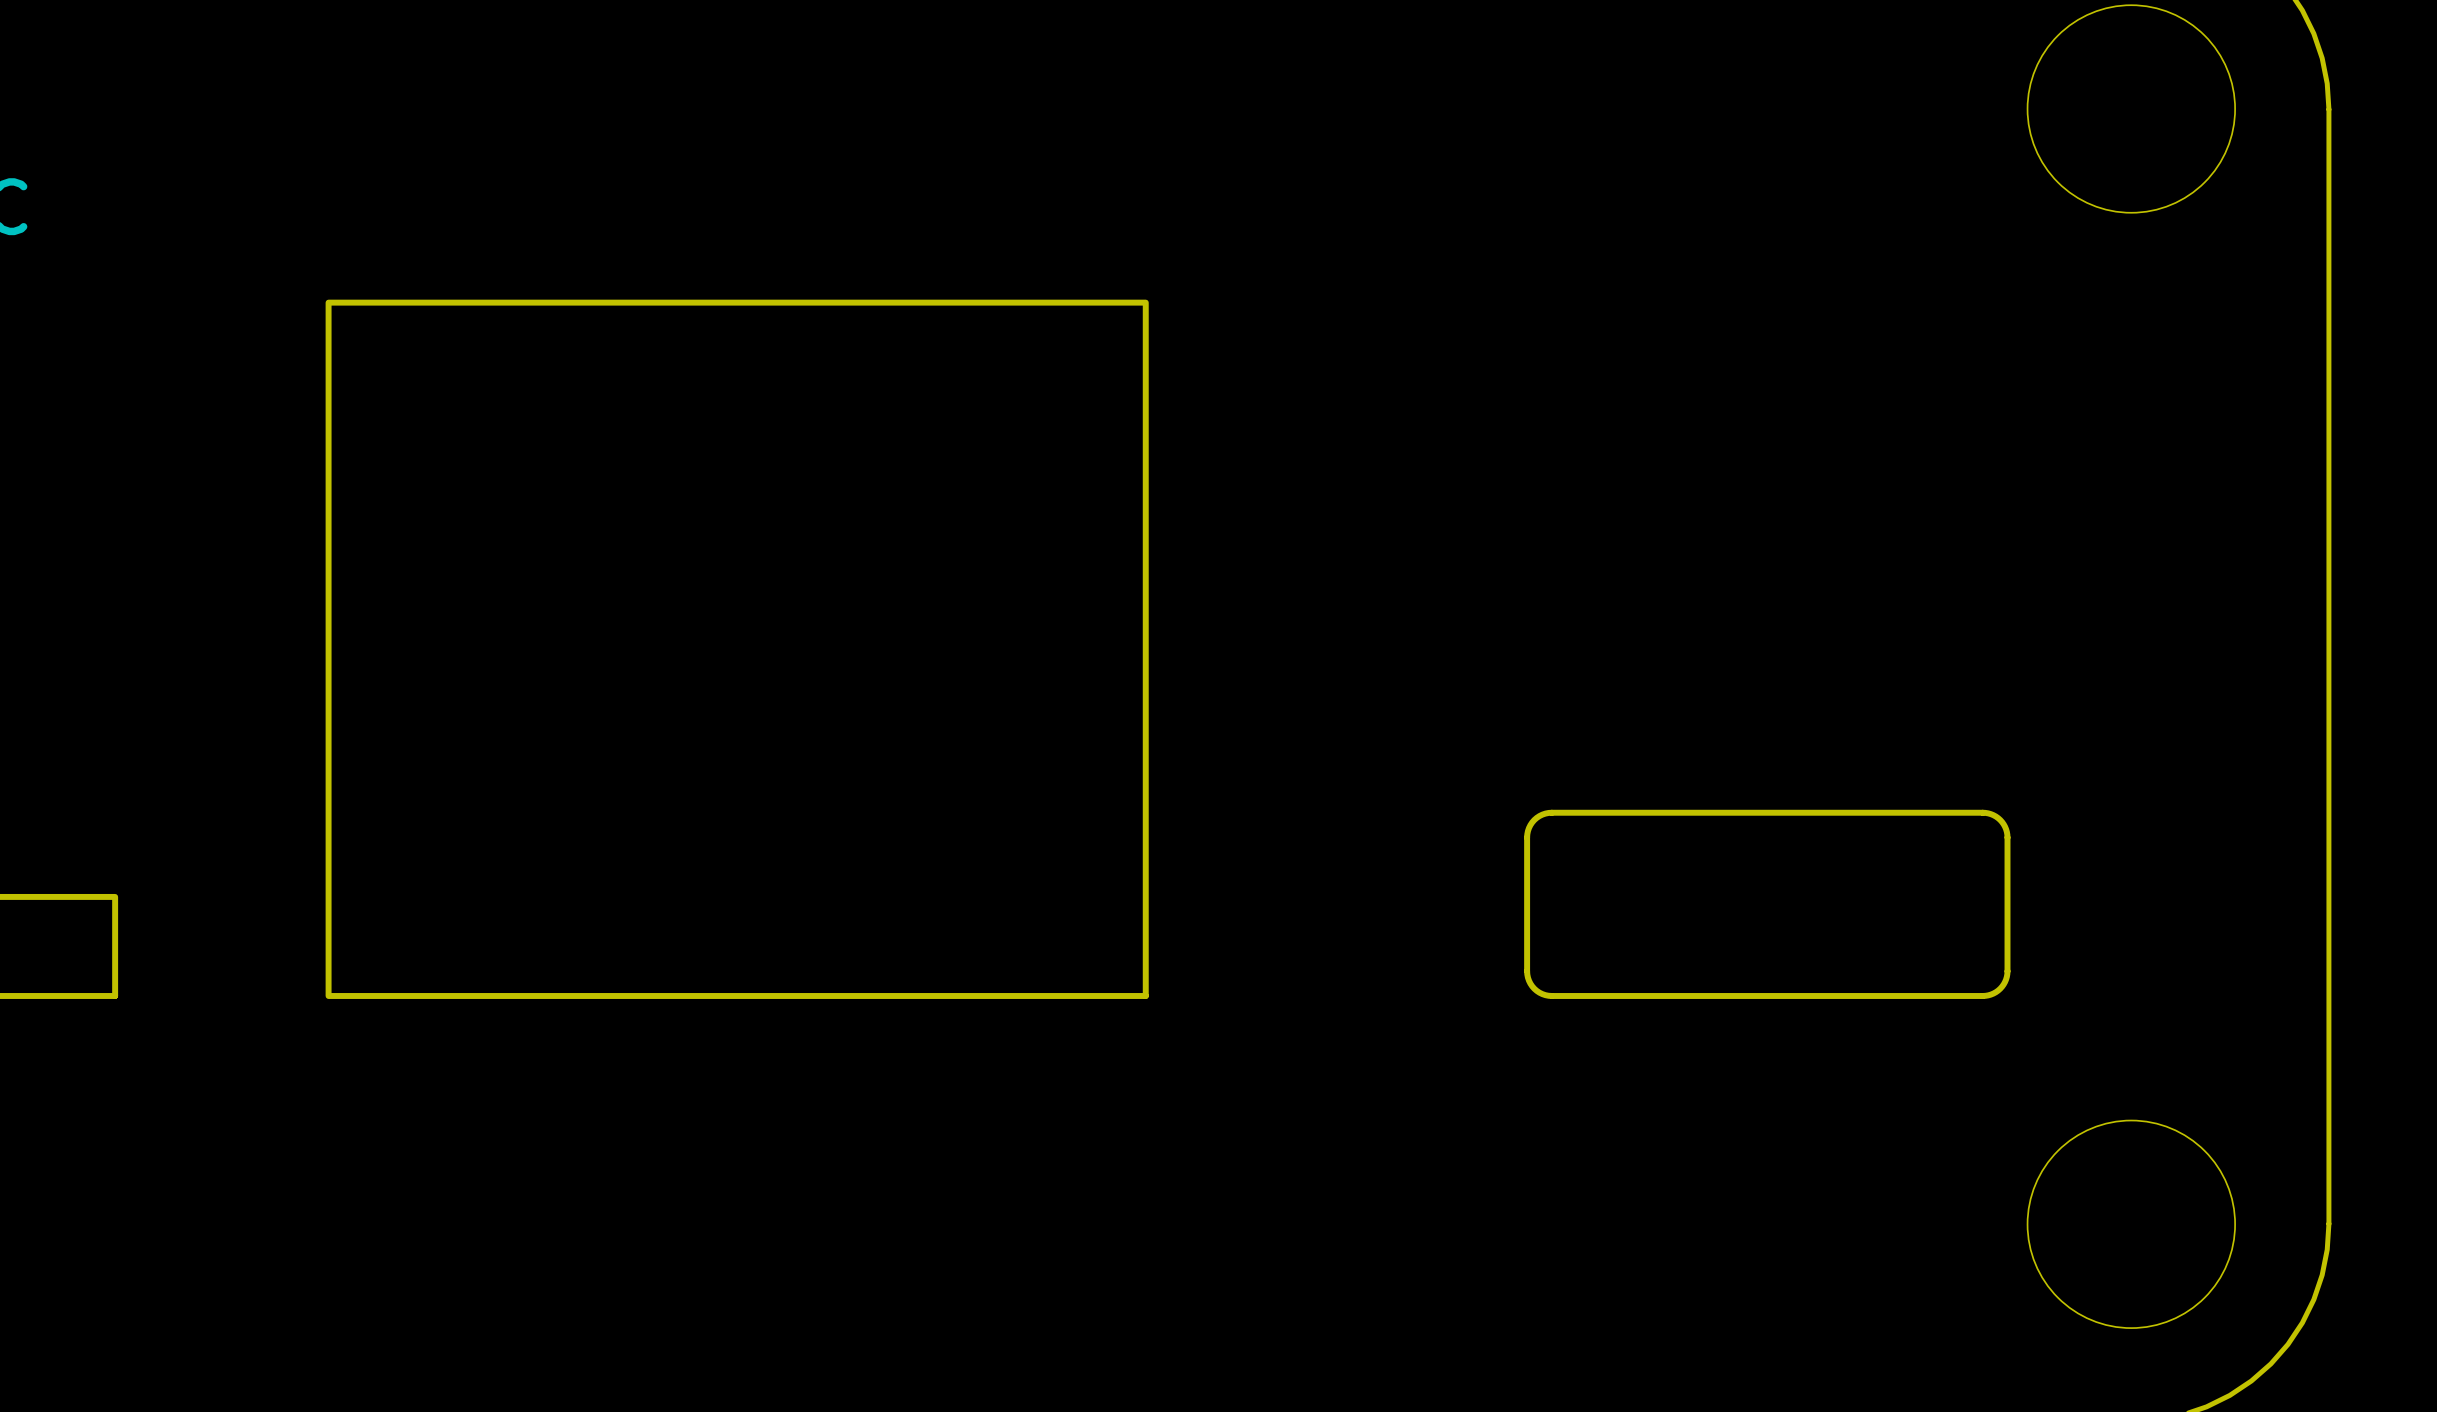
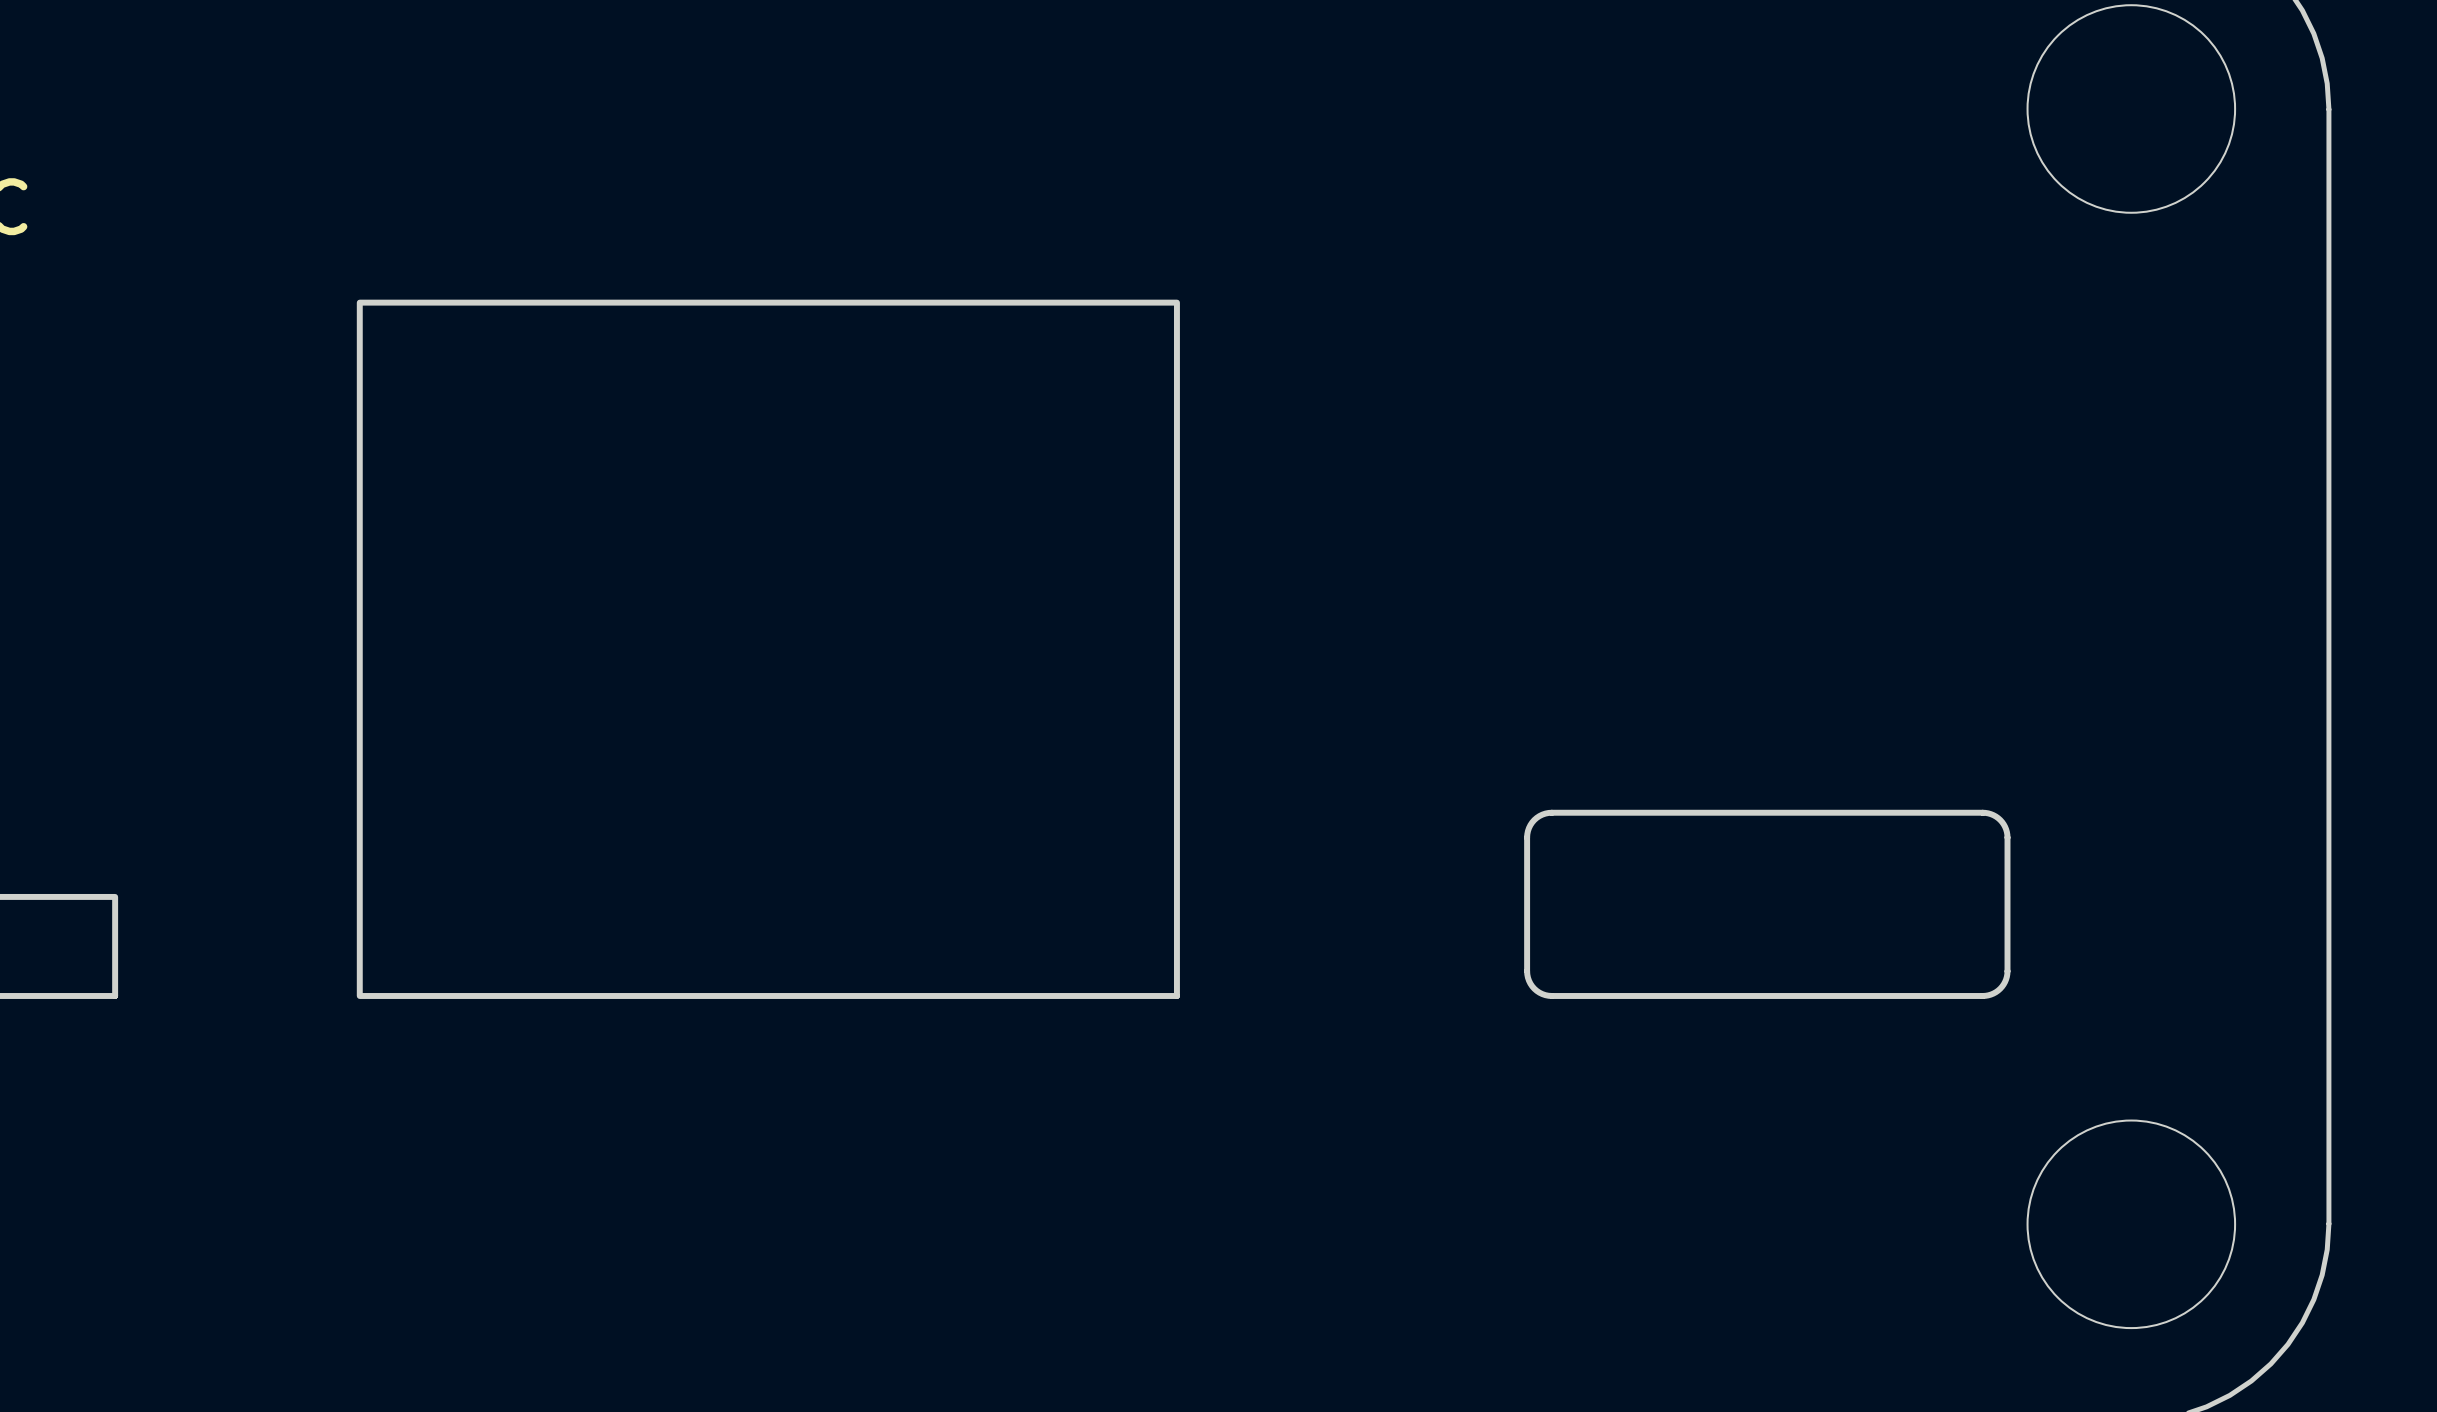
drawing position: (737, 649) -> (768, 649)

